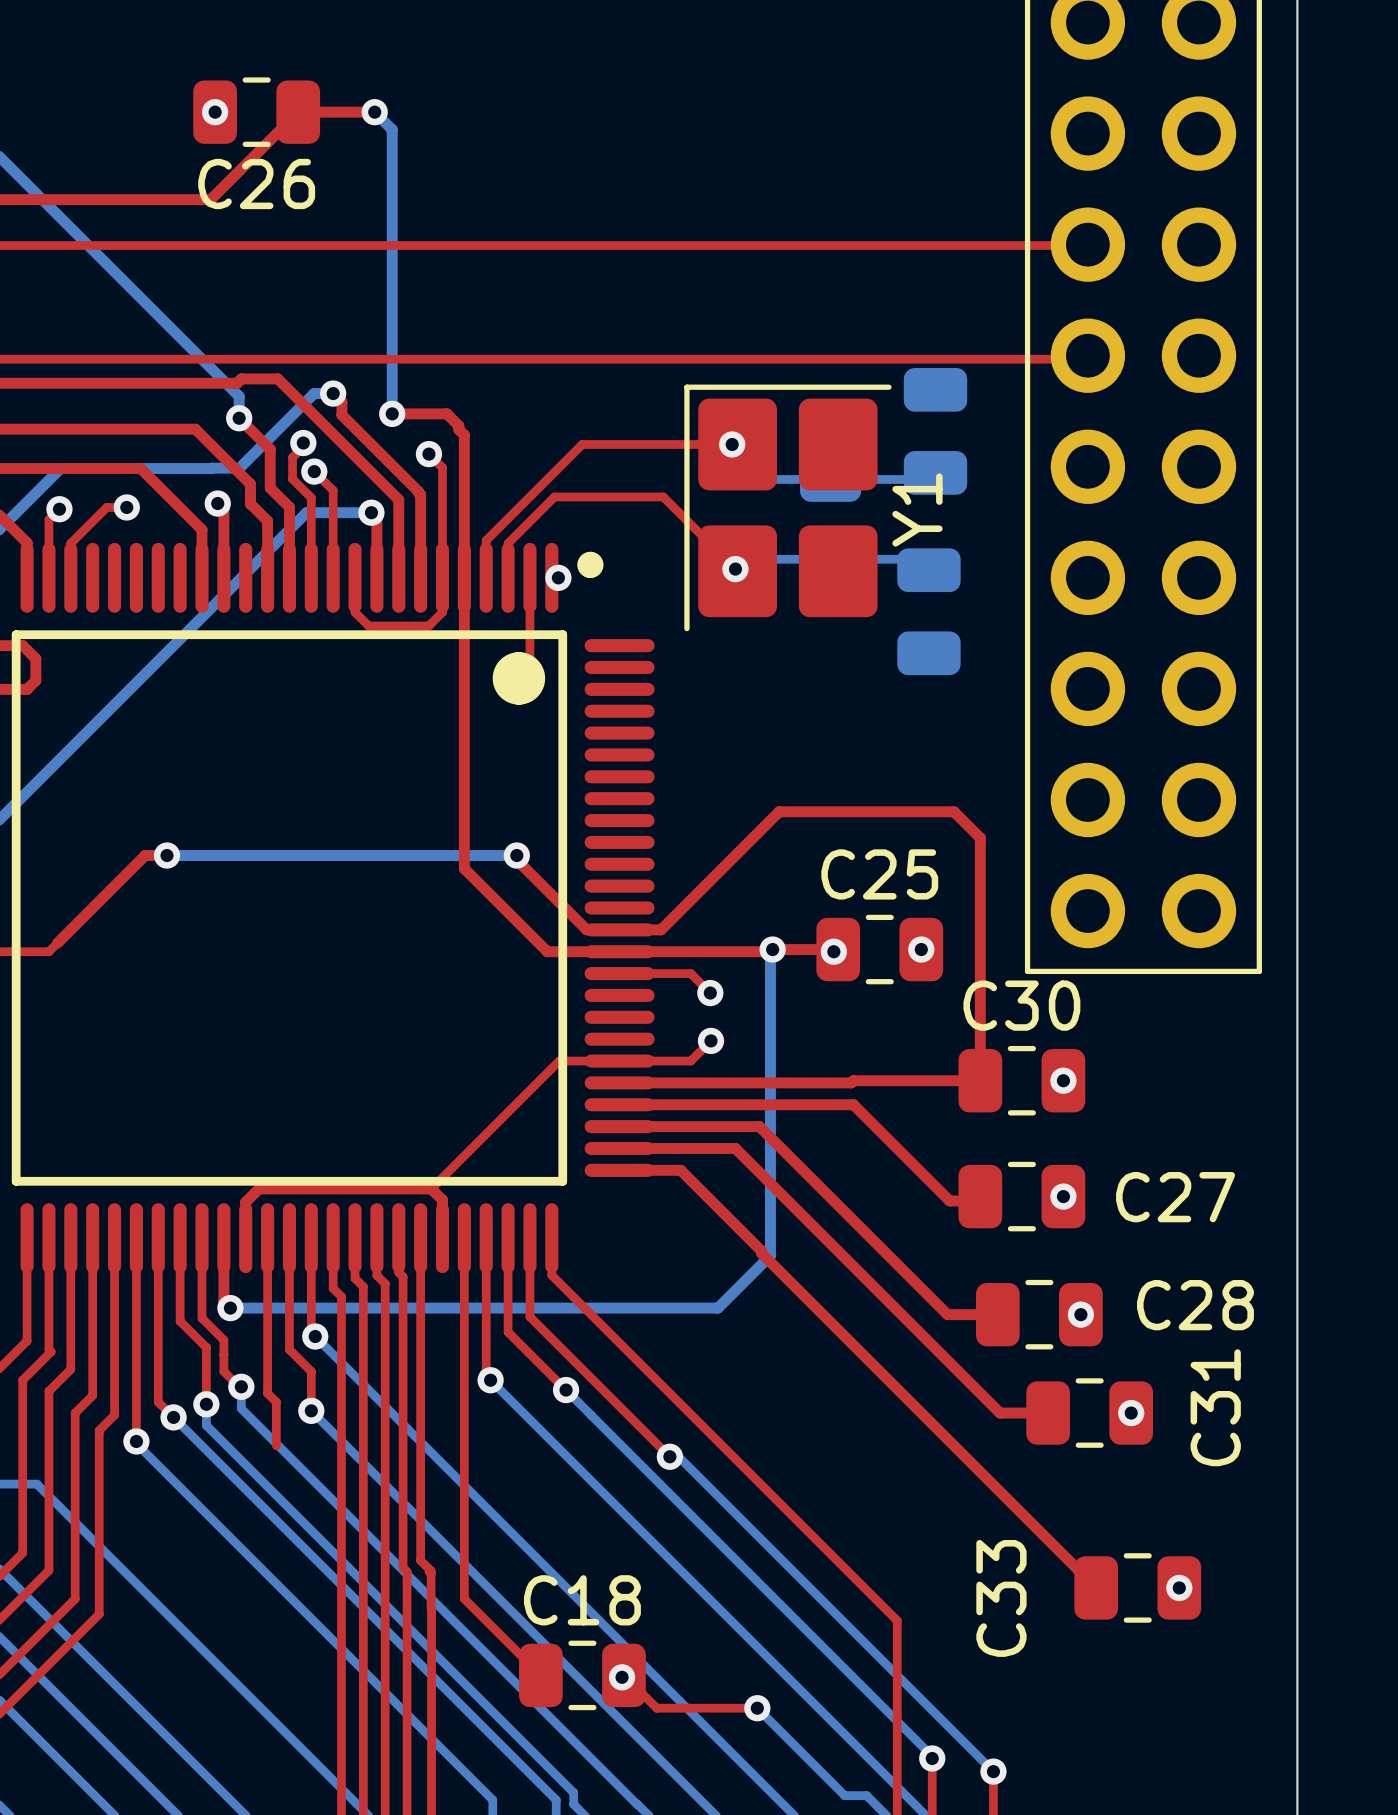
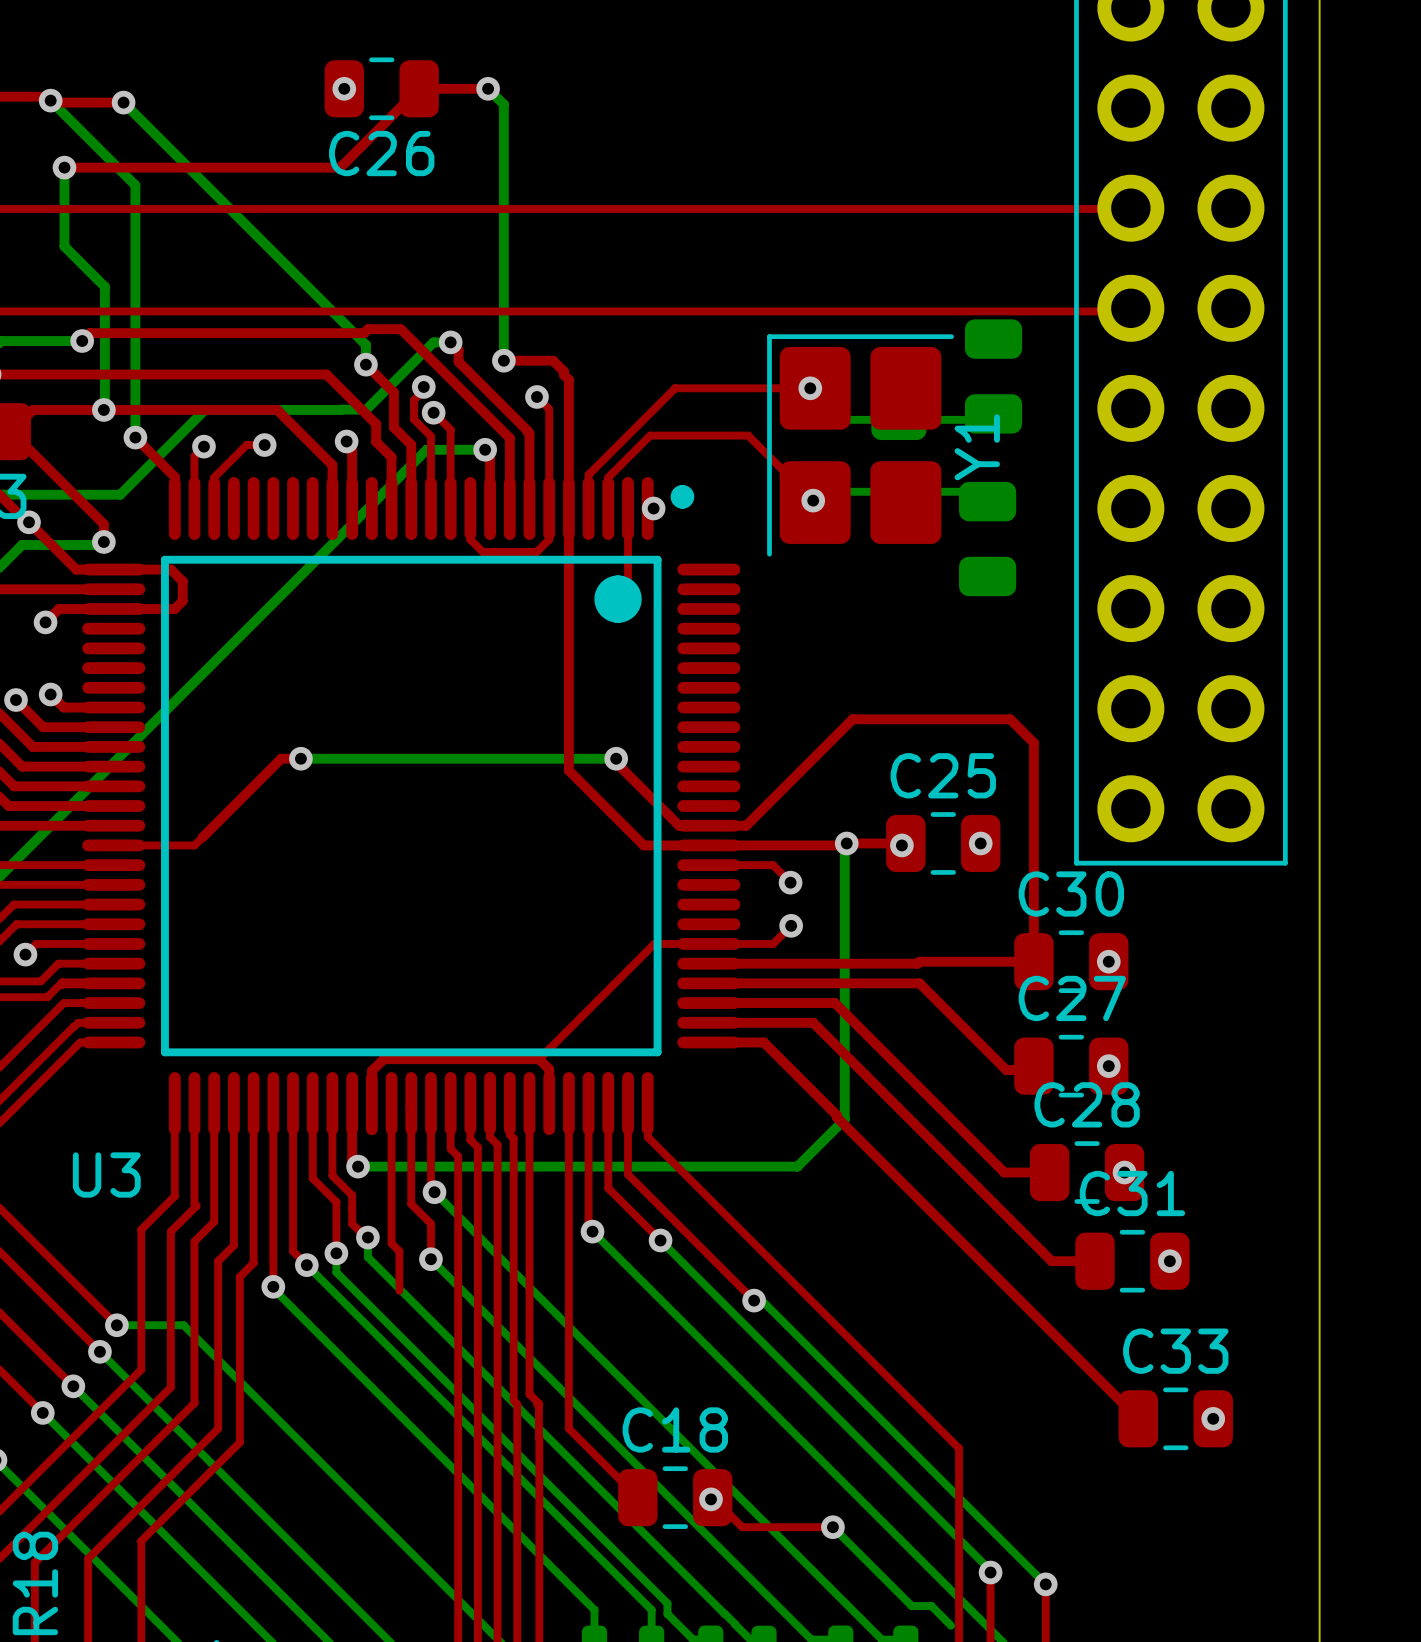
C27 name position: C27 (1175, 1197) -> C27 (1072, 998)
C28 name position: C28 (1195, 1305) -> C28 (1087, 1104)
C31 name rotation: 0° (1215, 1407) -> 90° clockwise (1132, 1193)
C33 name rotation: 0° (1001, 1598) -> 90° clockwise (1175, 1351)
C33 name position: C33 (1001, 1598) -> C33 (1175, 1351)

